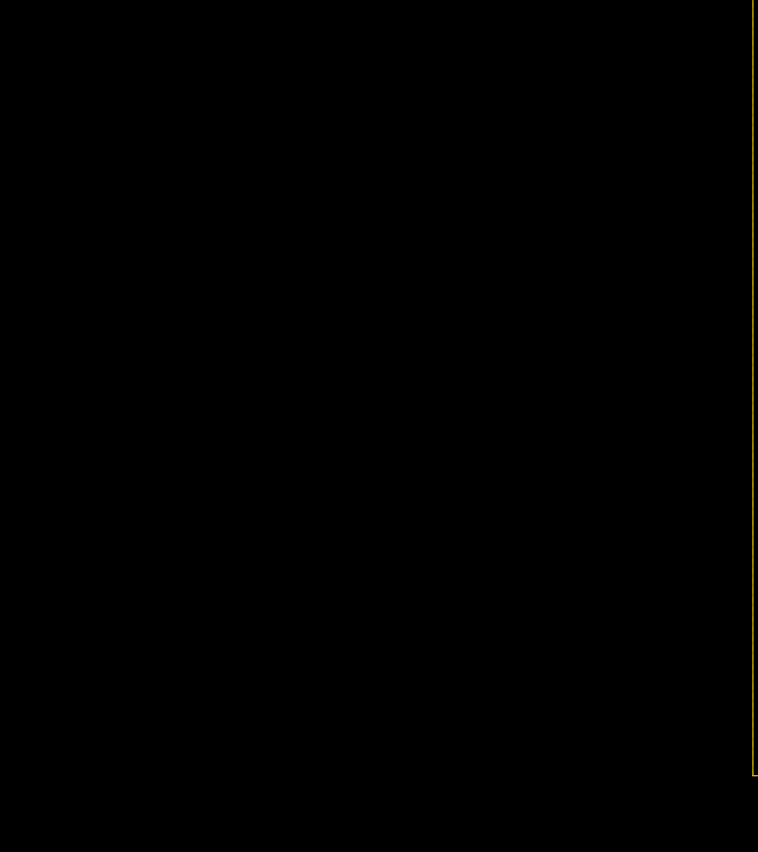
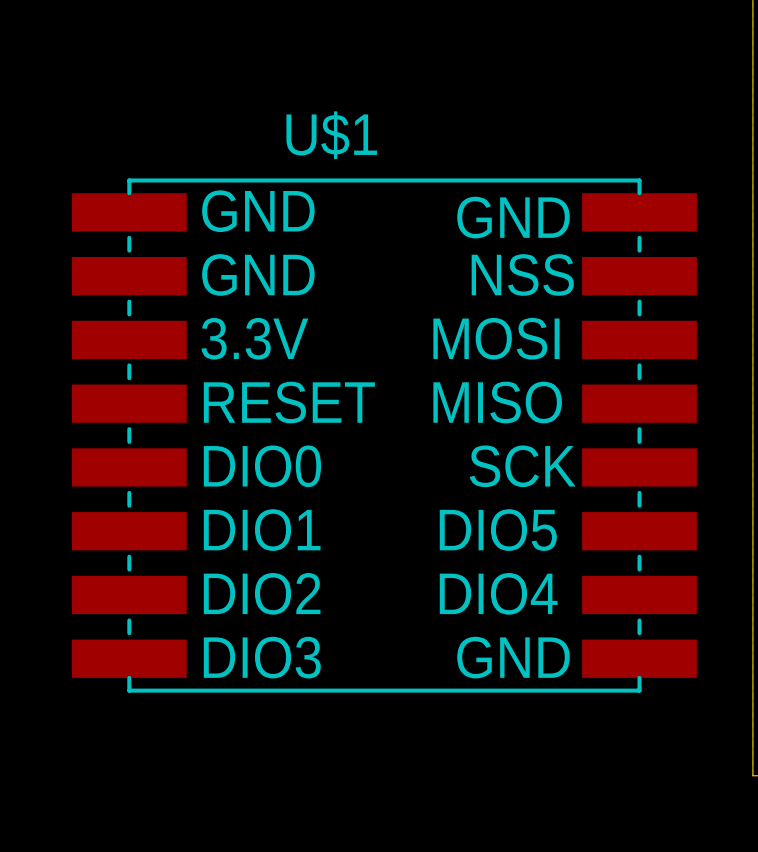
U$1: none -> (384, 435)

